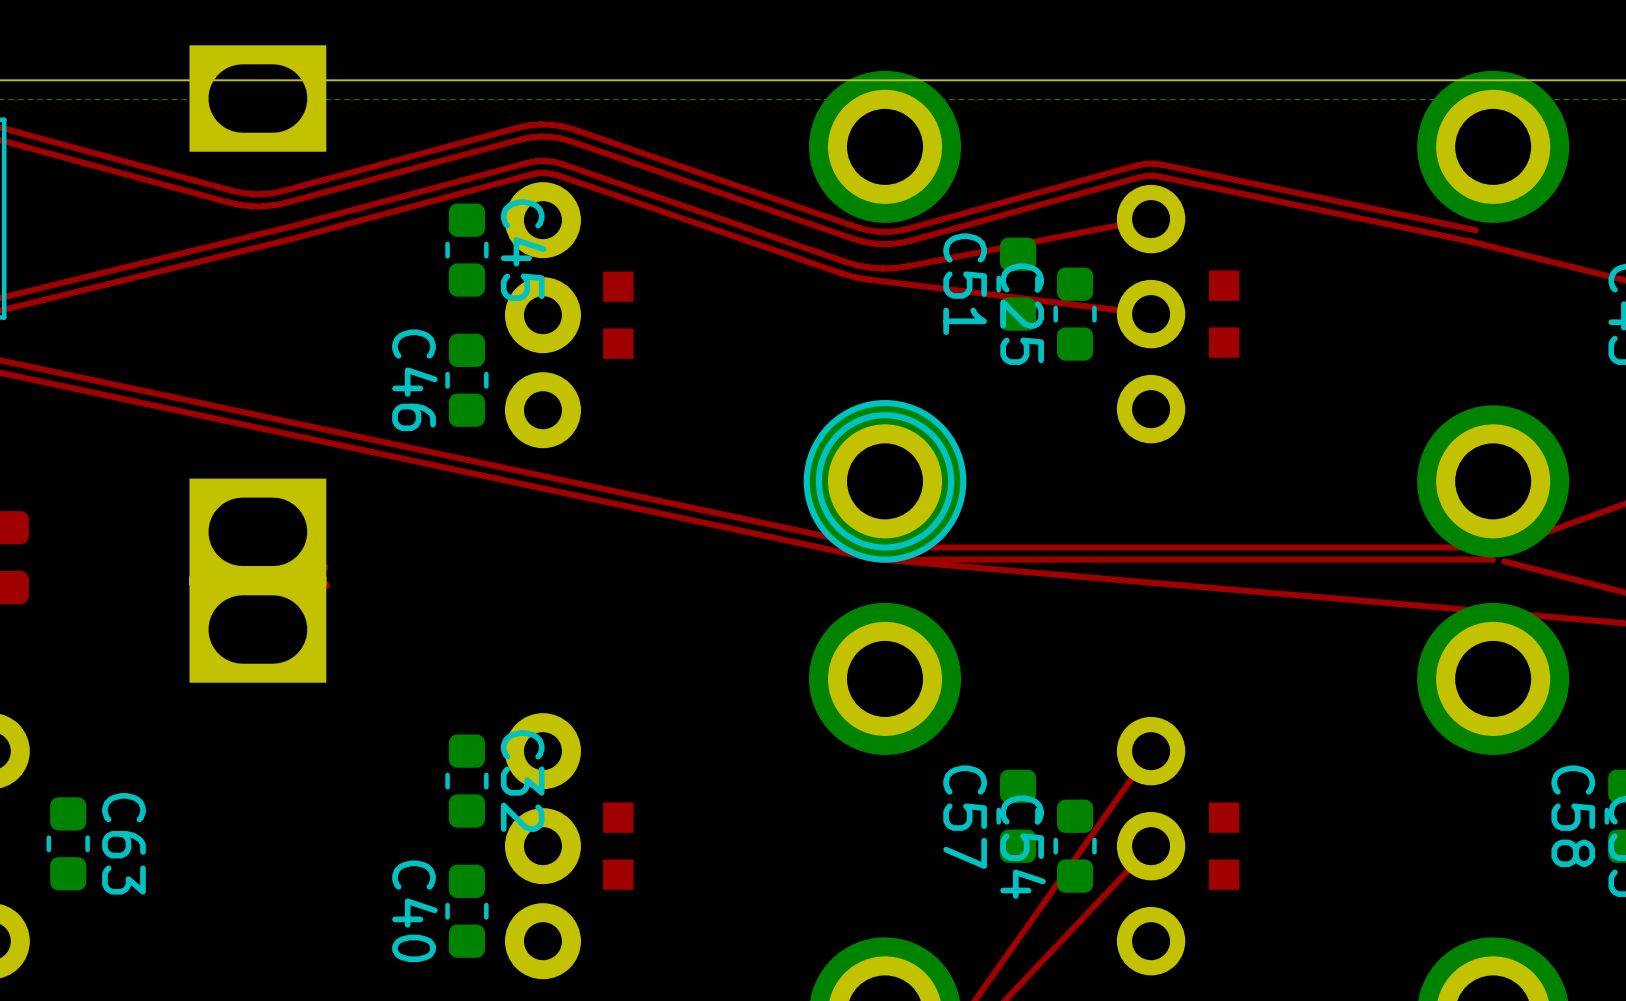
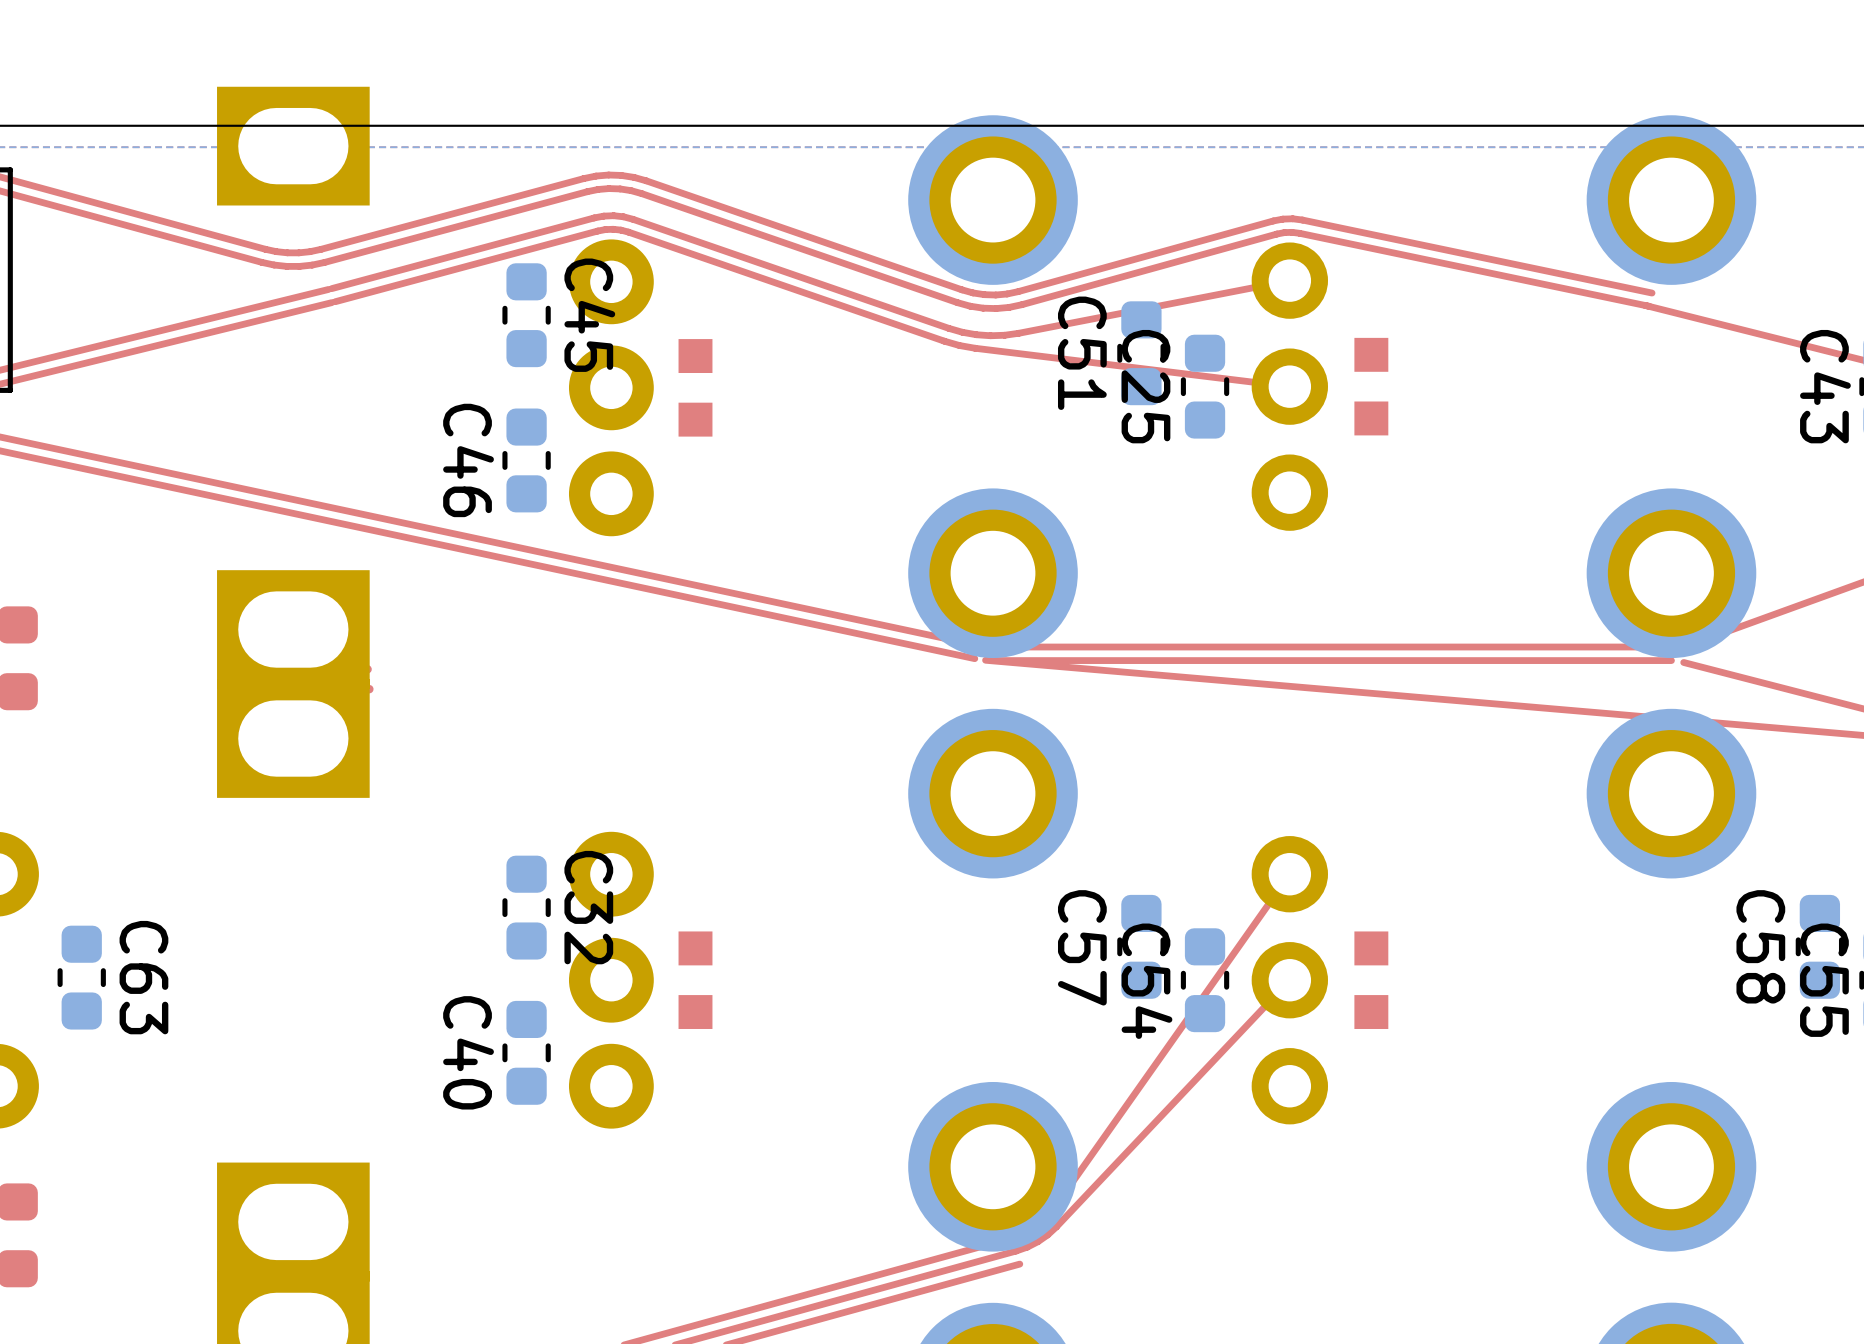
drawing: [803, 400, 967, 563] -> none

